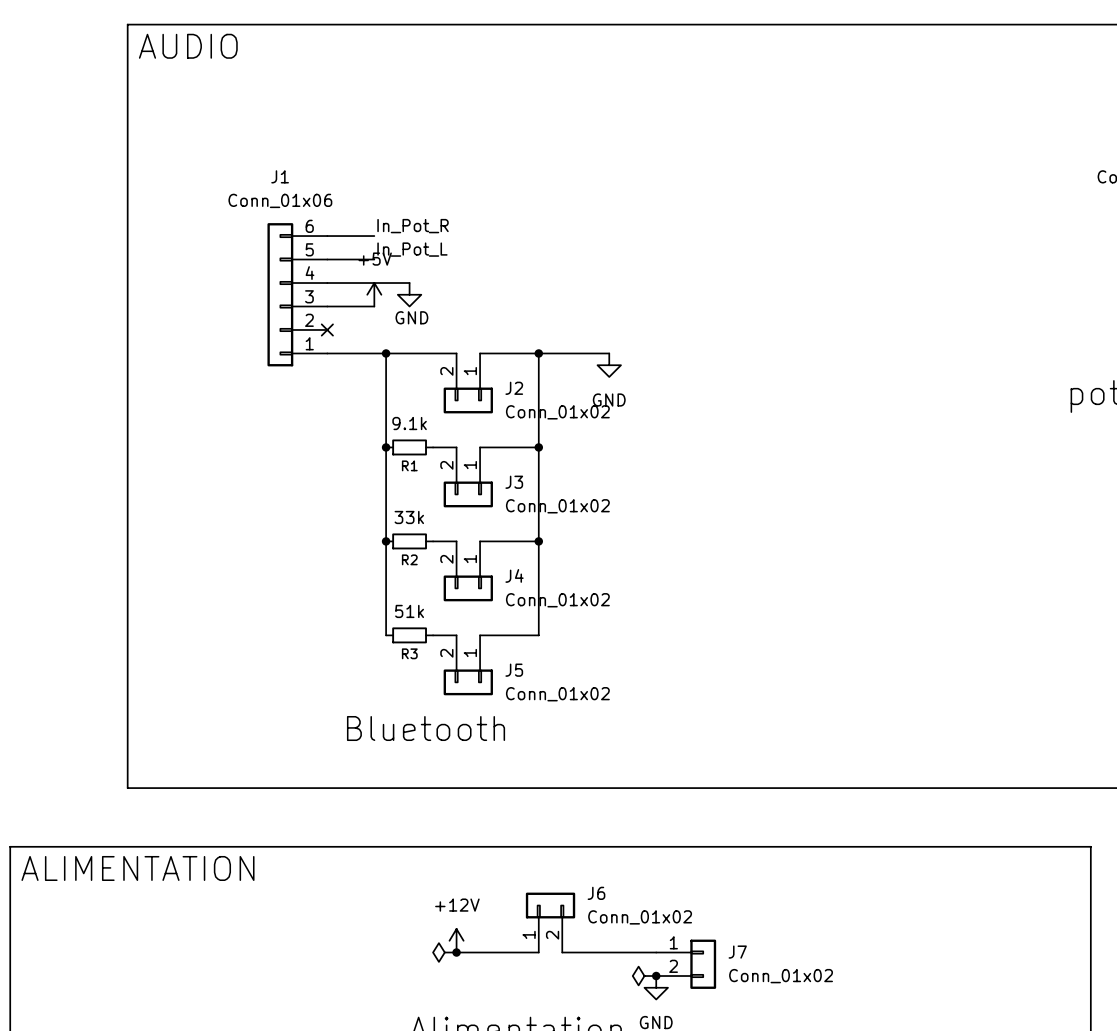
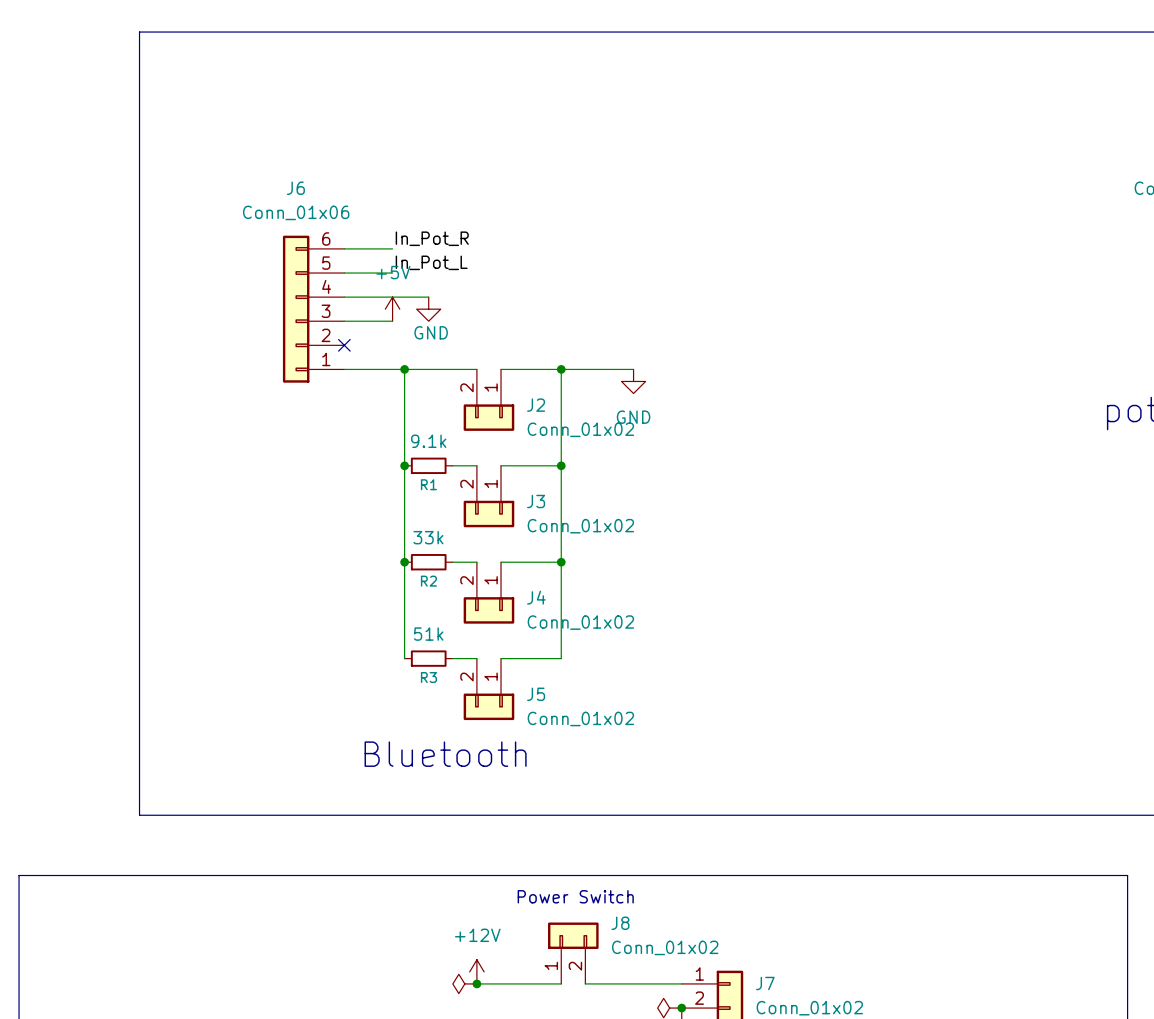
text: AUDIO (188, 46) -> none
J1 name: J1 (280, 176) -> J6 (295, 188)
text: none -> Power Switch (575, 896)
text: ALIMENTATION (137, 868) -> none
J6 name: J6 (596, 893) -> J8 (620, 923)

